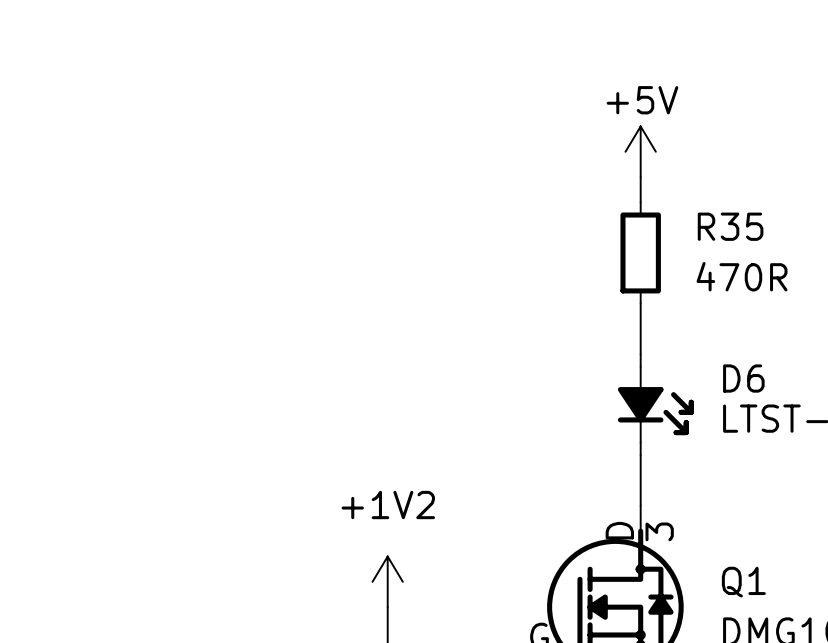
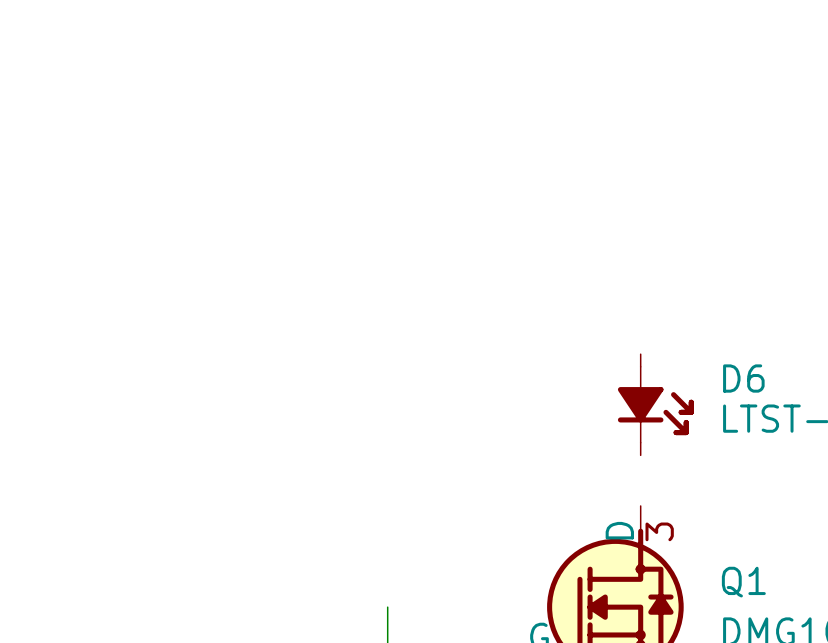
power symbol: +5V (640, 151) -> none
wire: (640, 177) (640, 202) -> none
R35: (640, 252) -> none
wire: (640, 303) (640, 354) -> none
wire: (640, 455) (640, 505) -> none
power symbol: +1V2 (387, 581) -> none

